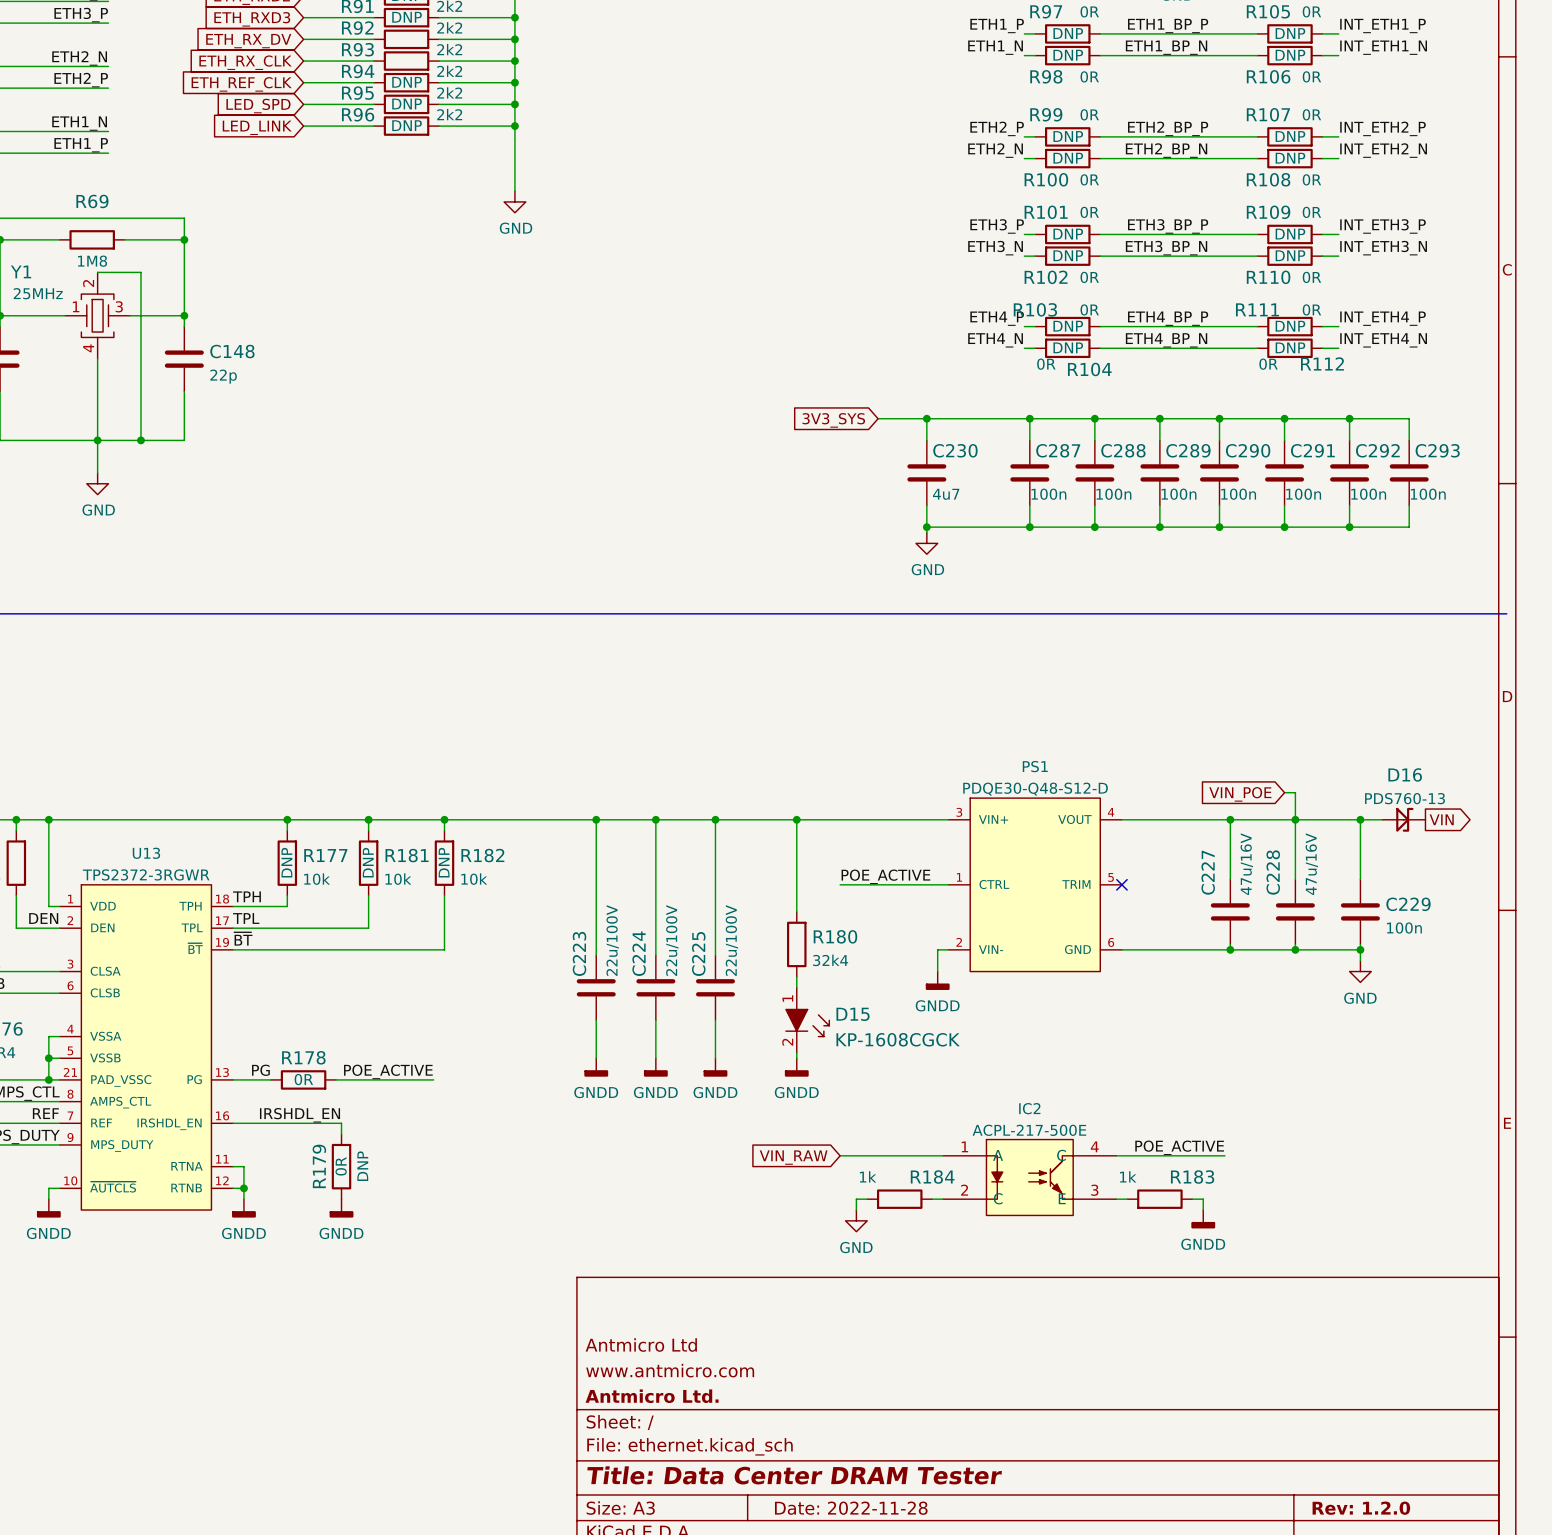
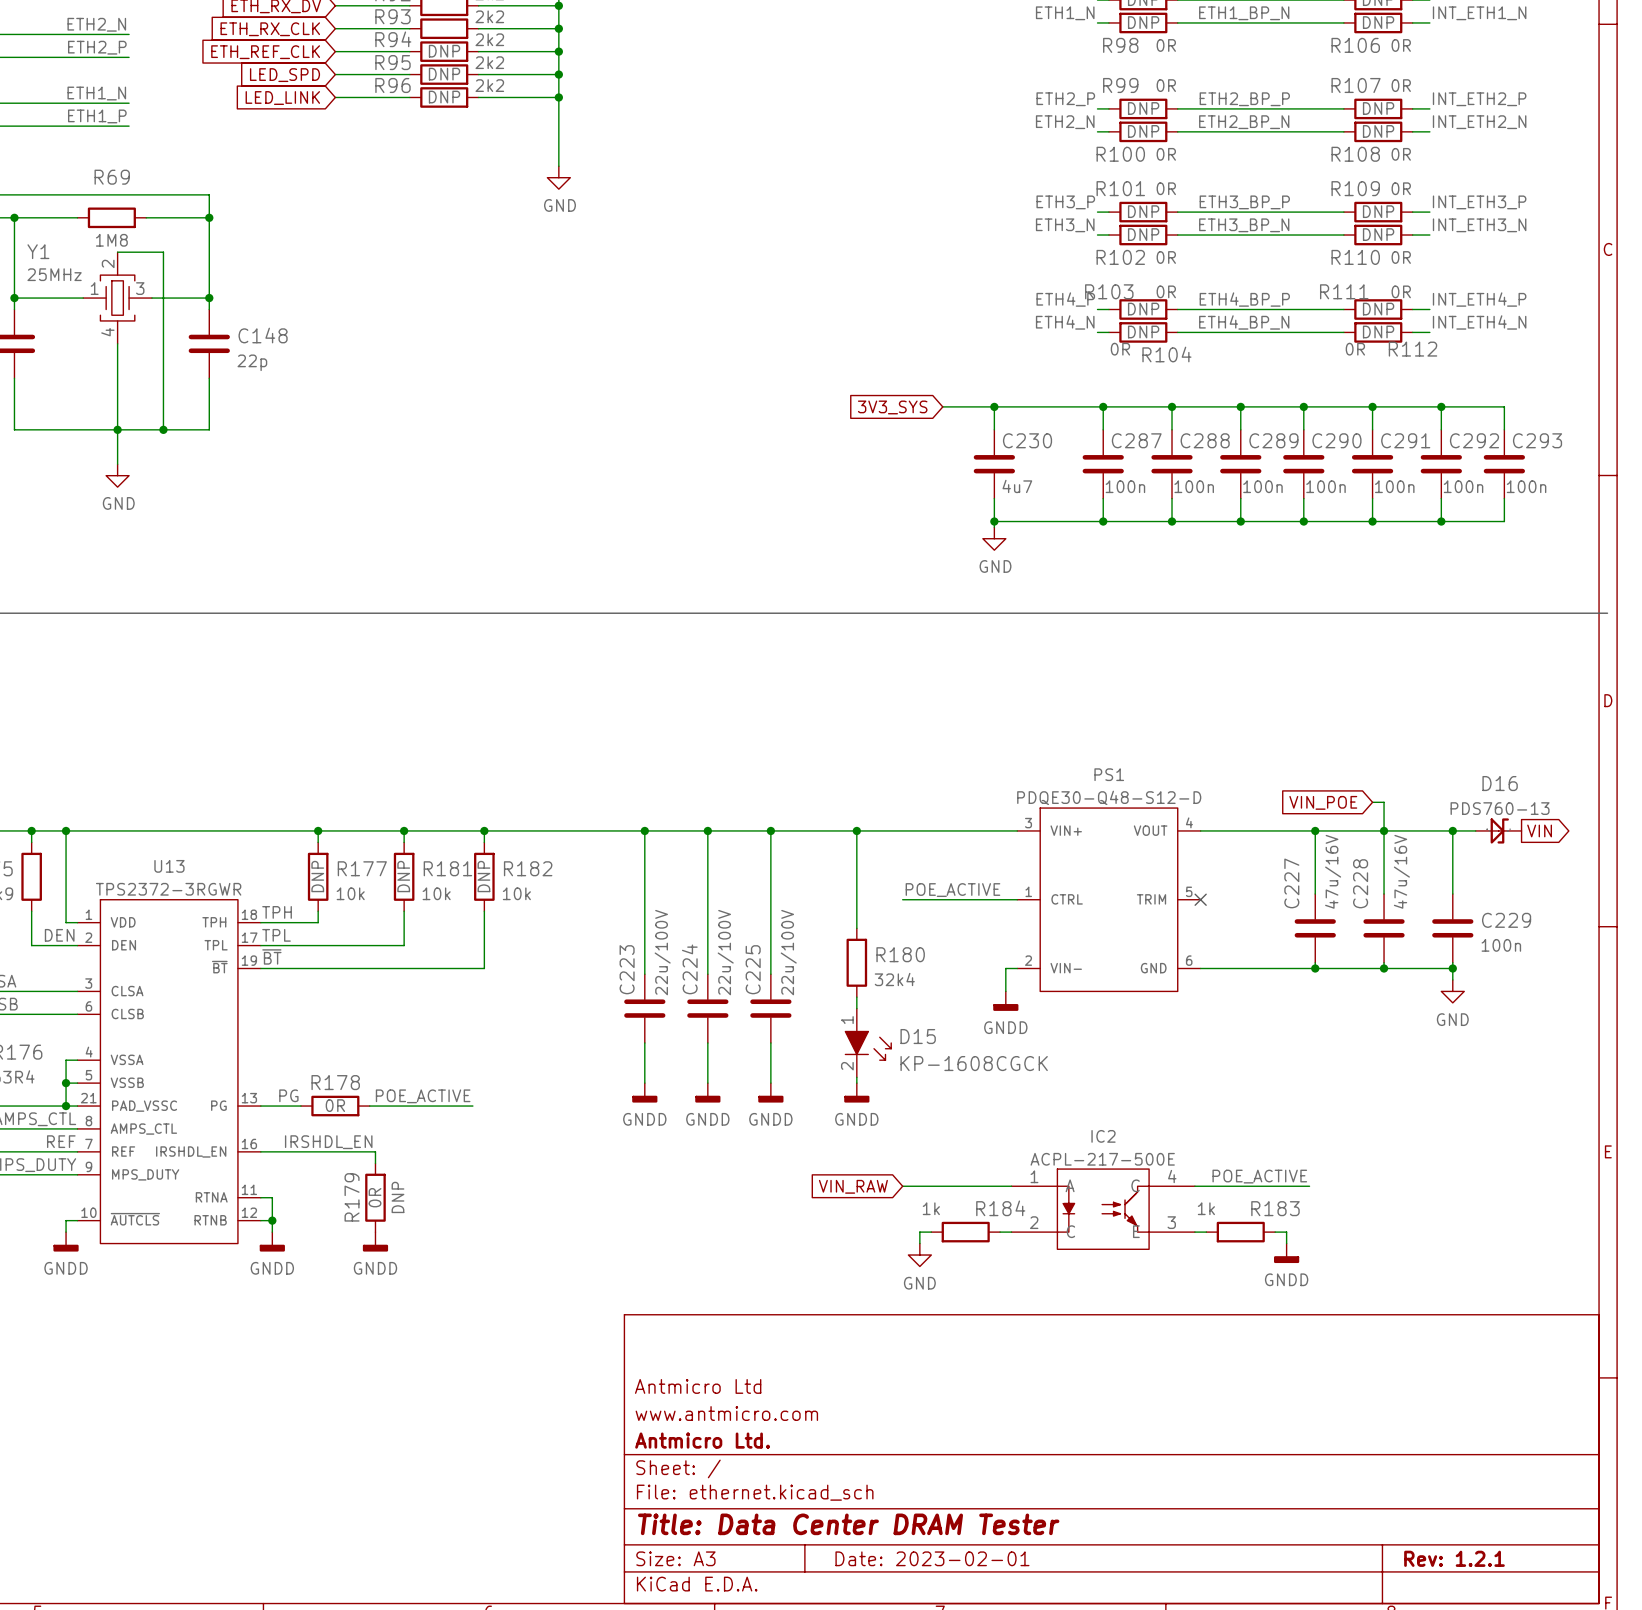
title block: Date: 2022-11-28 (851, 1508) -> Date: 2023-02-01 (932, 1558)
title block: Rev: 1.2.0 (1361, 1508) -> Rev: 1.2.1 (1454, 1558)

